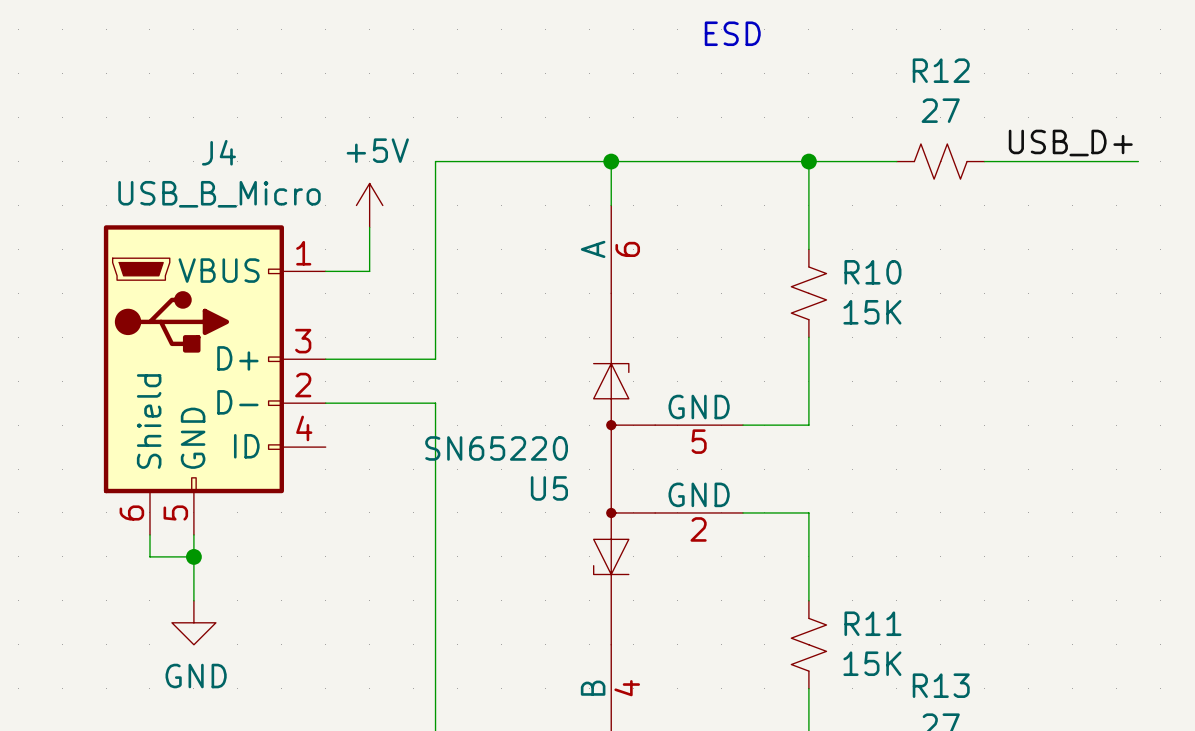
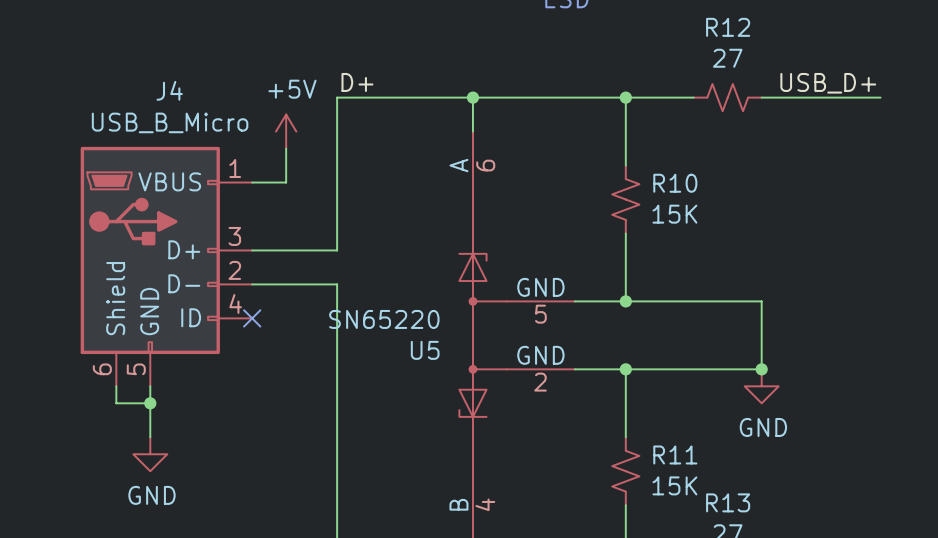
label: none -> D+ (357, 82)
wire: none -> (625, 301) (761, 301) (761, 369) (625, 369)
junction: none -> (625, 301)
no-connect mark: none -> (252, 318)
junction: none -> (625, 369)
junction: none -> (761, 369)
power symbol: none -> GND (761, 386)

